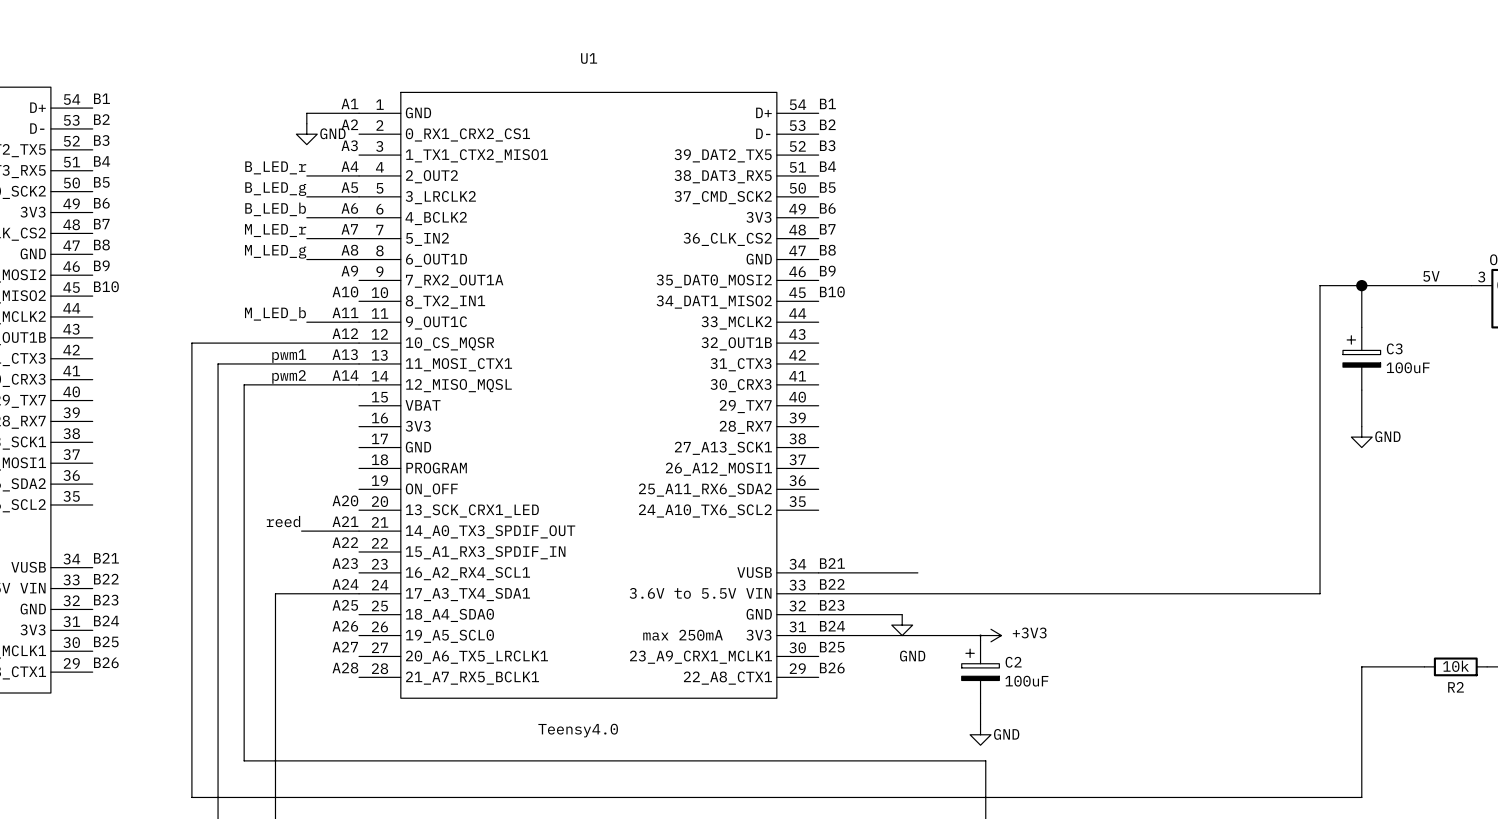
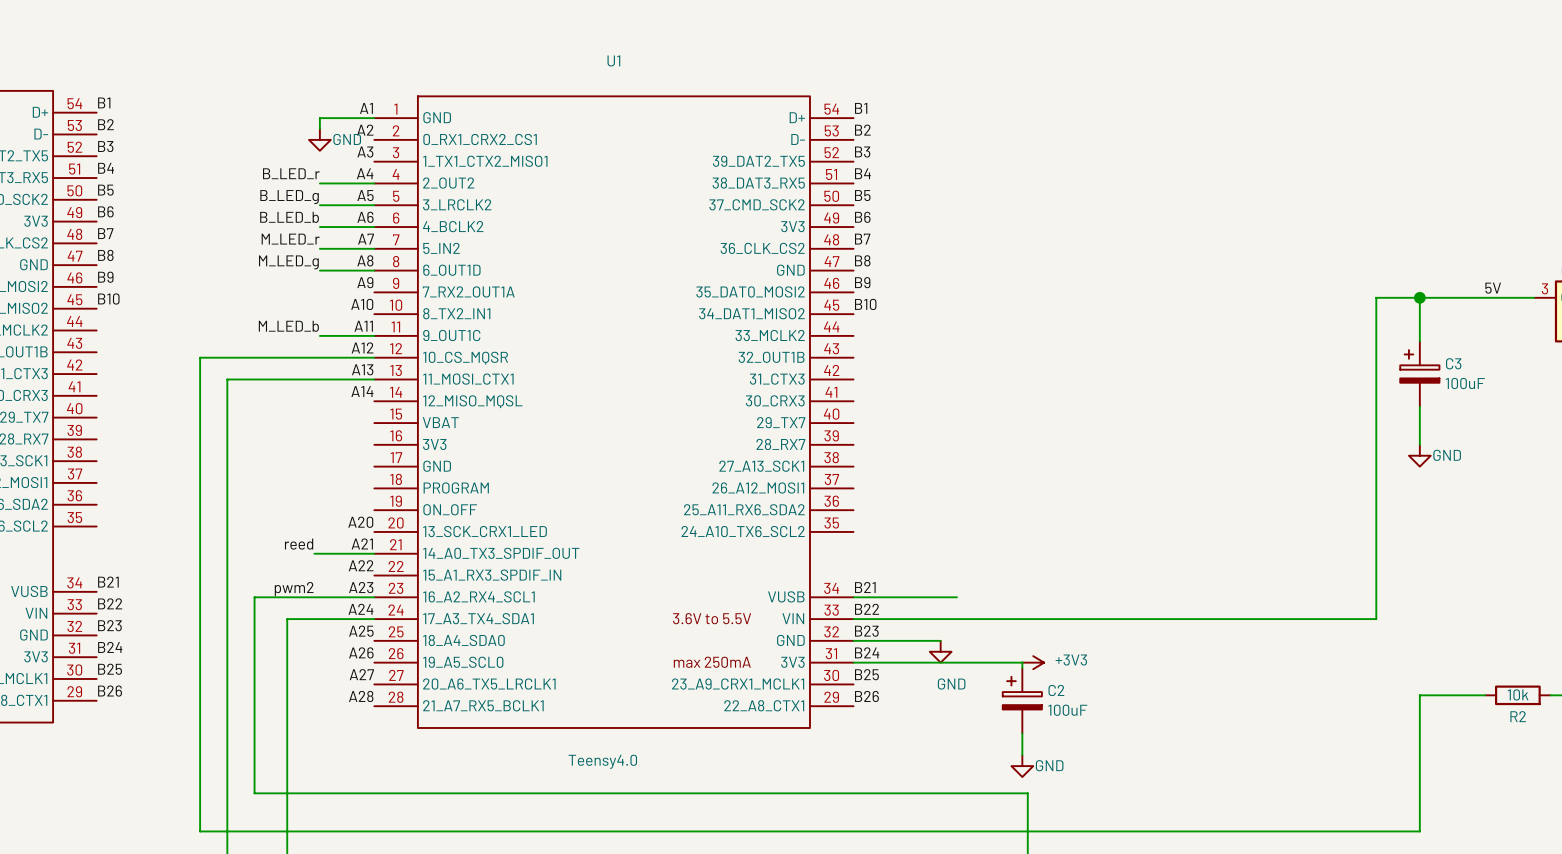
label: pwm1 (289, 356) -> none
label position: pwm2 (289, 376) -> pwm2 (294, 589)
wire: (359, 384) (244, 384) (244, 572) -> (374, 597) (254, 597)

